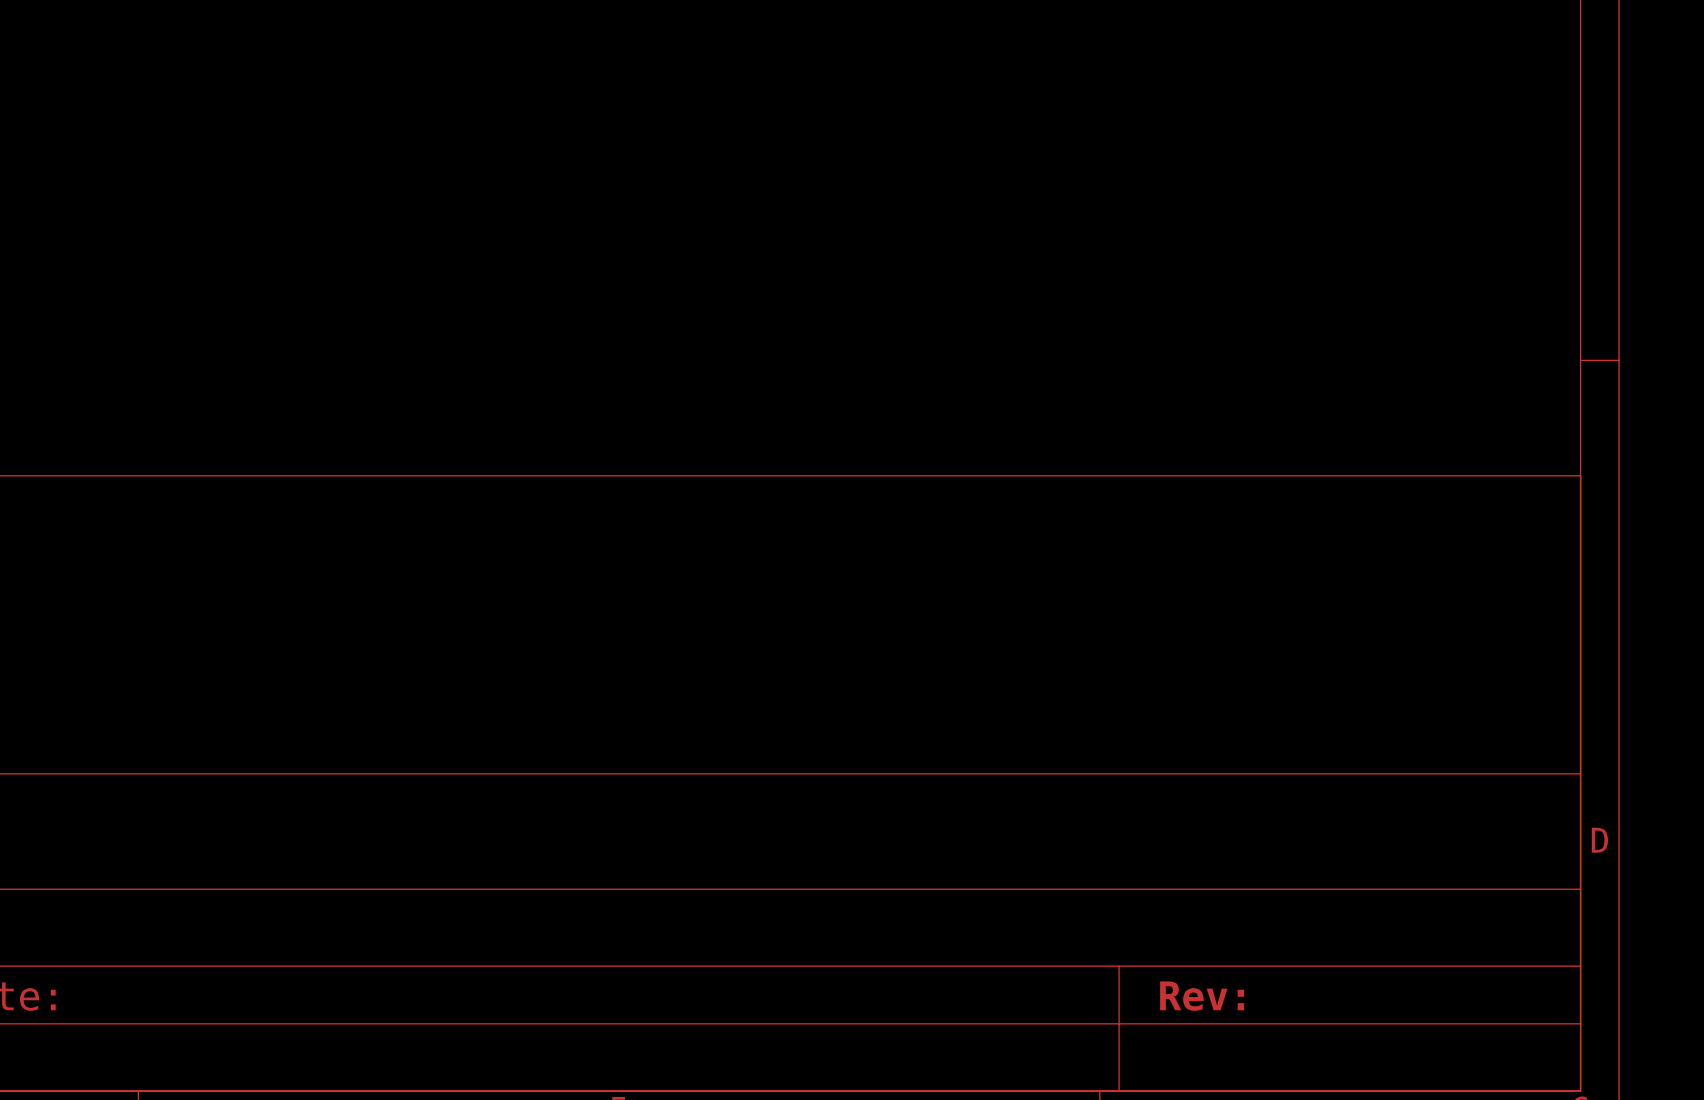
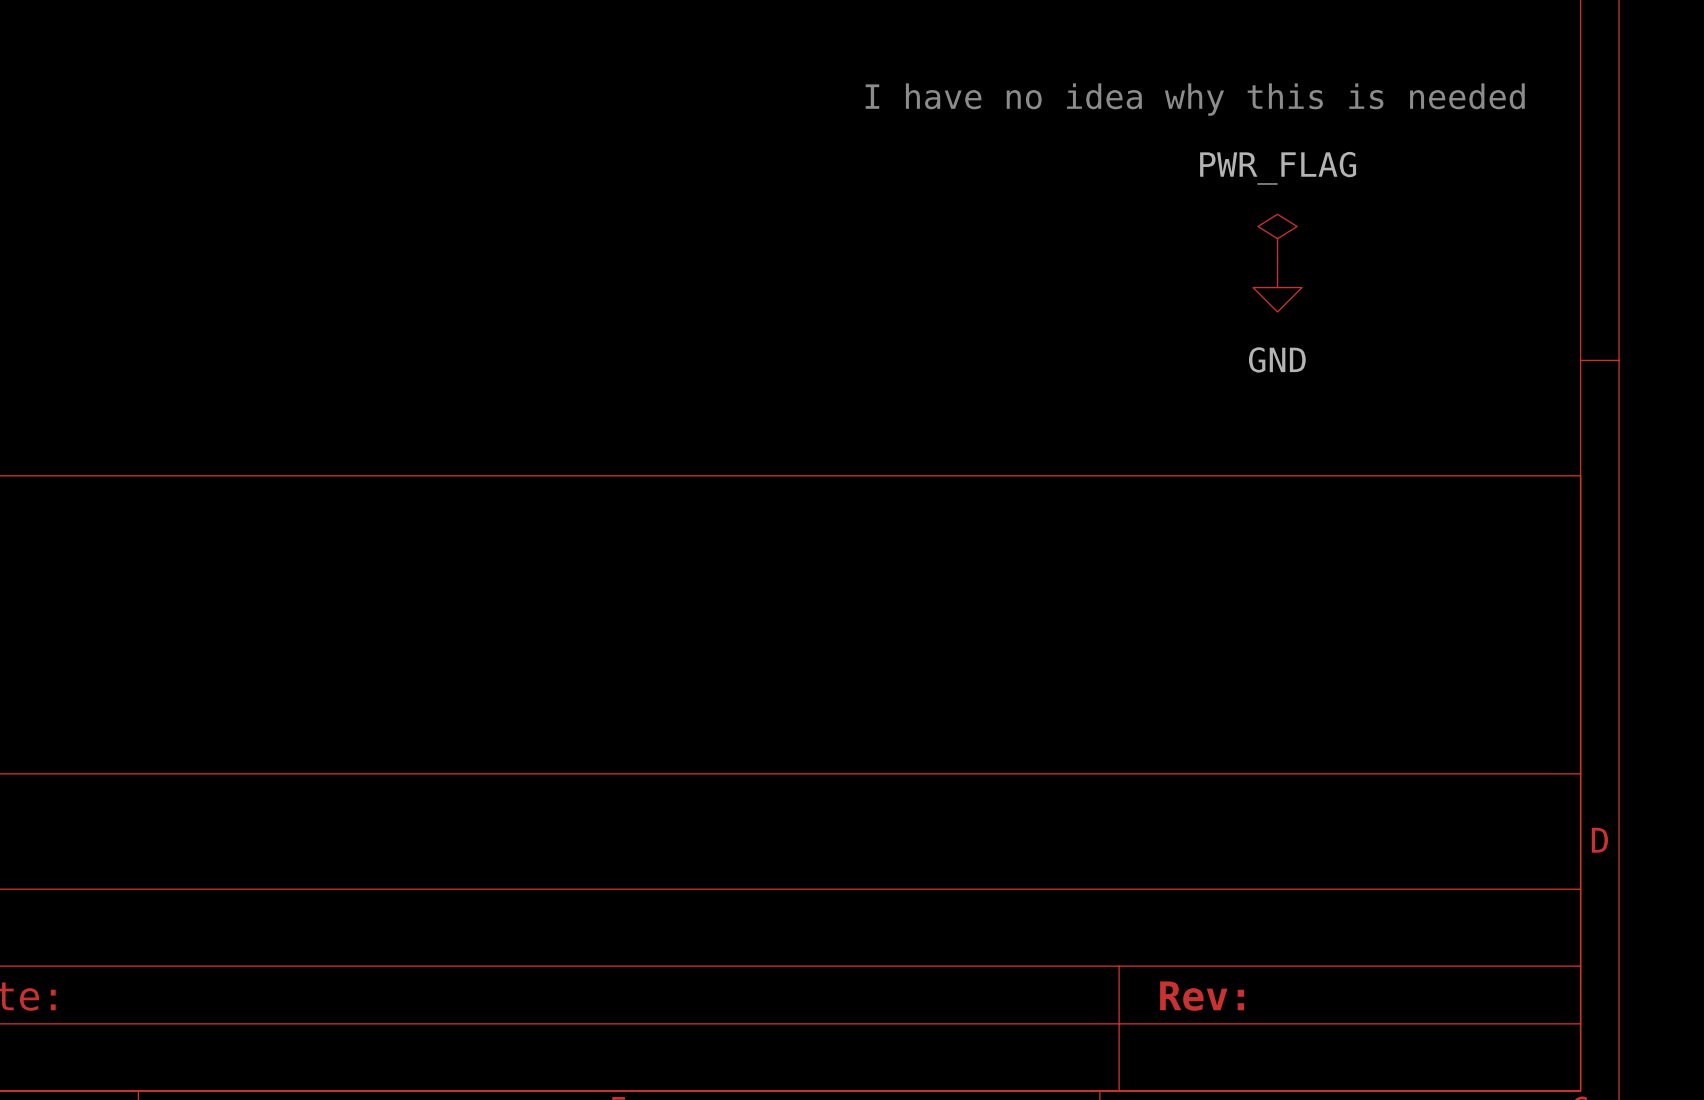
text: none -> I have no idea why this is needed (1195, 99)
power symbol: none -> PWR_FLAG (1277, 238)
power symbol: none -> GND (1277, 287)

